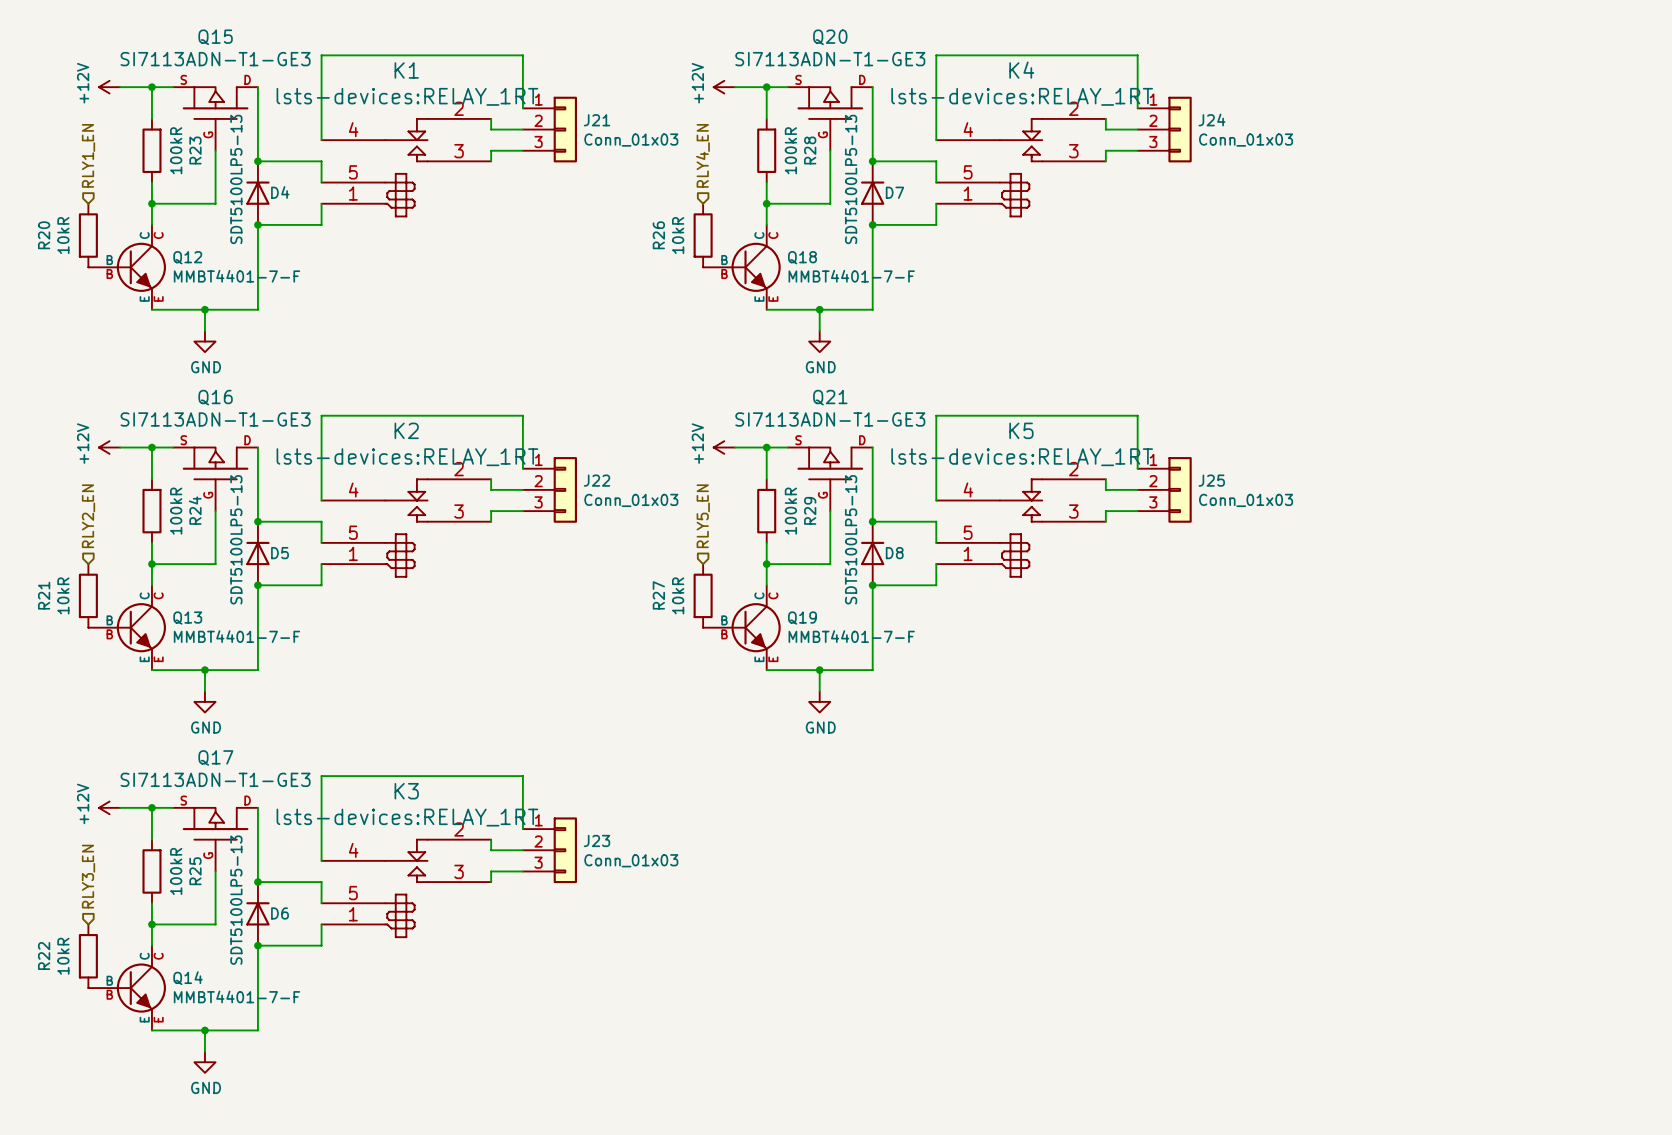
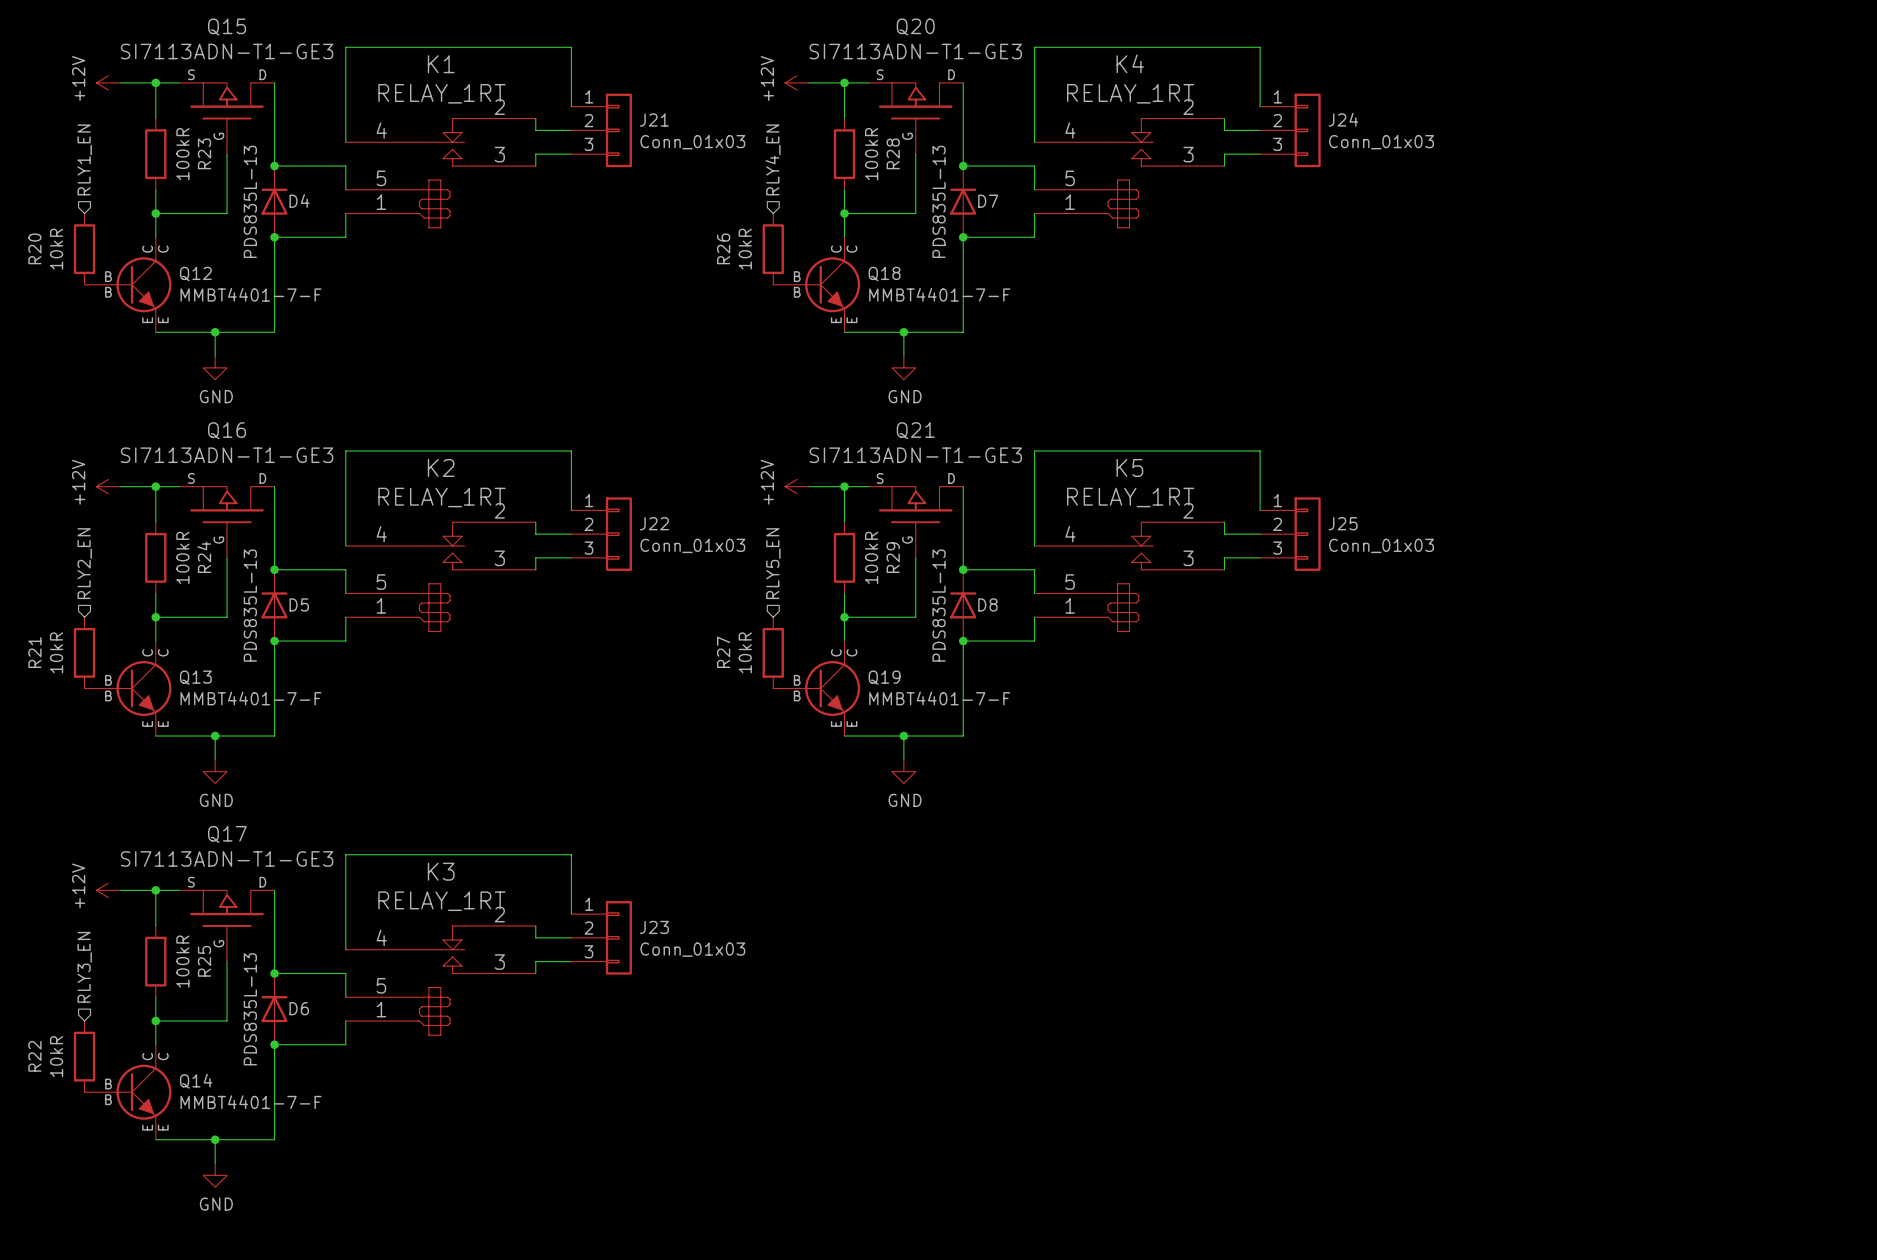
K1 value: lsts-devices:RELAY_1RT (407, 96) -> RELAY_1RT (441, 93)
K4 value: lsts-devices:RELAY_1RT (1022, 96) -> RELAY_1RT (1130, 93)
D4 value: SDT5100LP5-13 (236, 179) -> PDS835L-13 (250, 201)
D7 value: SDT5100LP5-13 (851, 179) -> PDS835L-13 (939, 201)
K2 value: lsts-devices:RELAY_1RT (407, 457) -> RELAY_1RT (441, 497)
K5 value: lsts-devices:RELAY_1RT (1022, 457) -> RELAY_1RT (1130, 497)
D5 value: SDT5100LP5-13 (236, 539) -> PDS835L-13 (250, 605)
D8 value: SDT5100LP5-13 (851, 539) -> PDS835L-13 (939, 605)
K3 value: lsts-devices:RELAY_1RT (407, 817) -> RELAY_1RT (441, 901)
D6 value: SDT5100LP5-13 (236, 900) -> PDS835L-13 (250, 1009)

